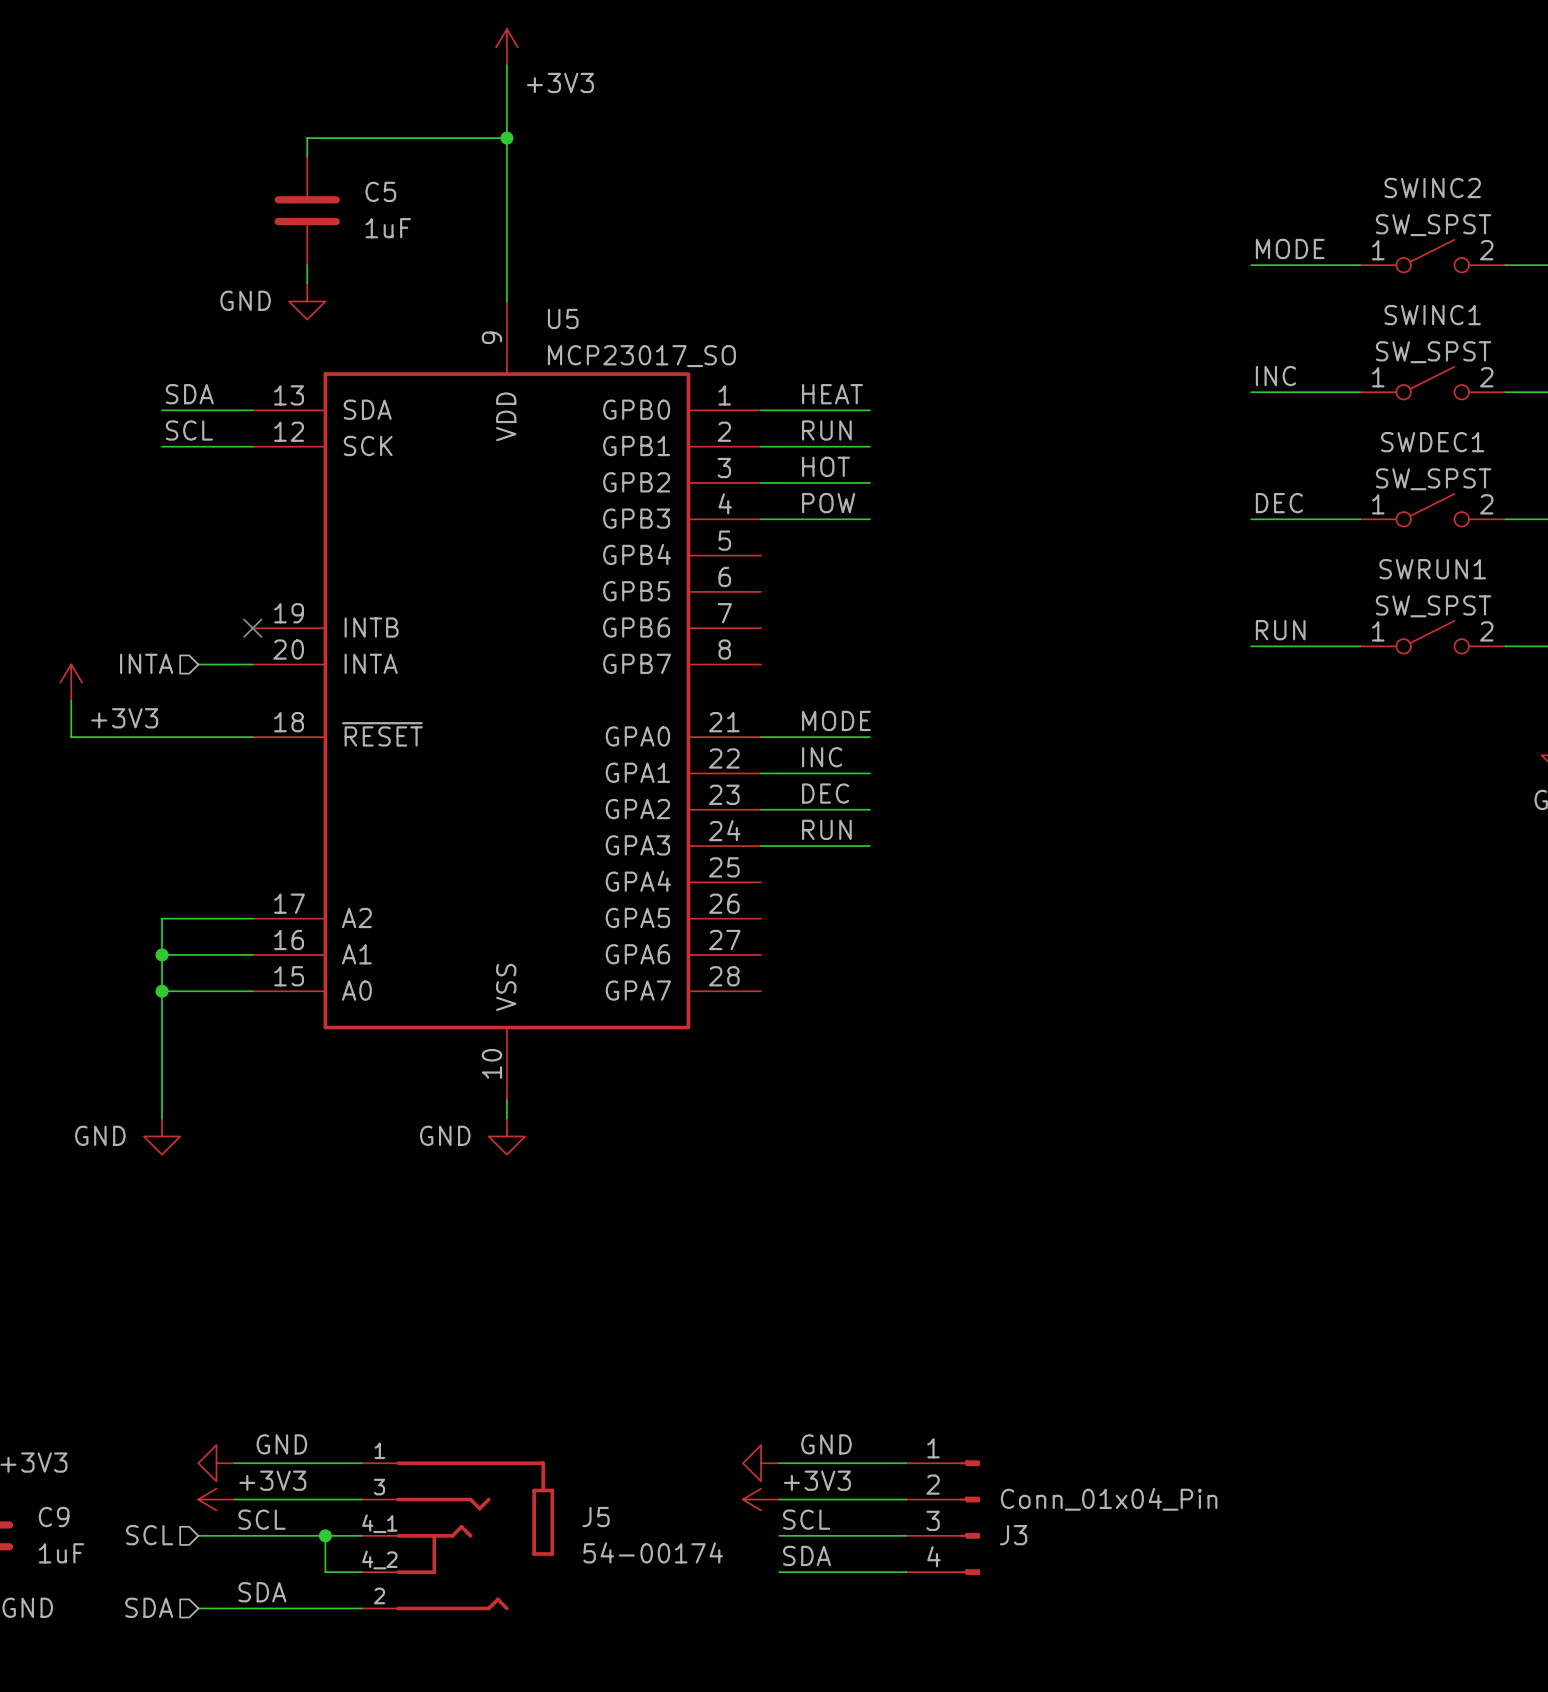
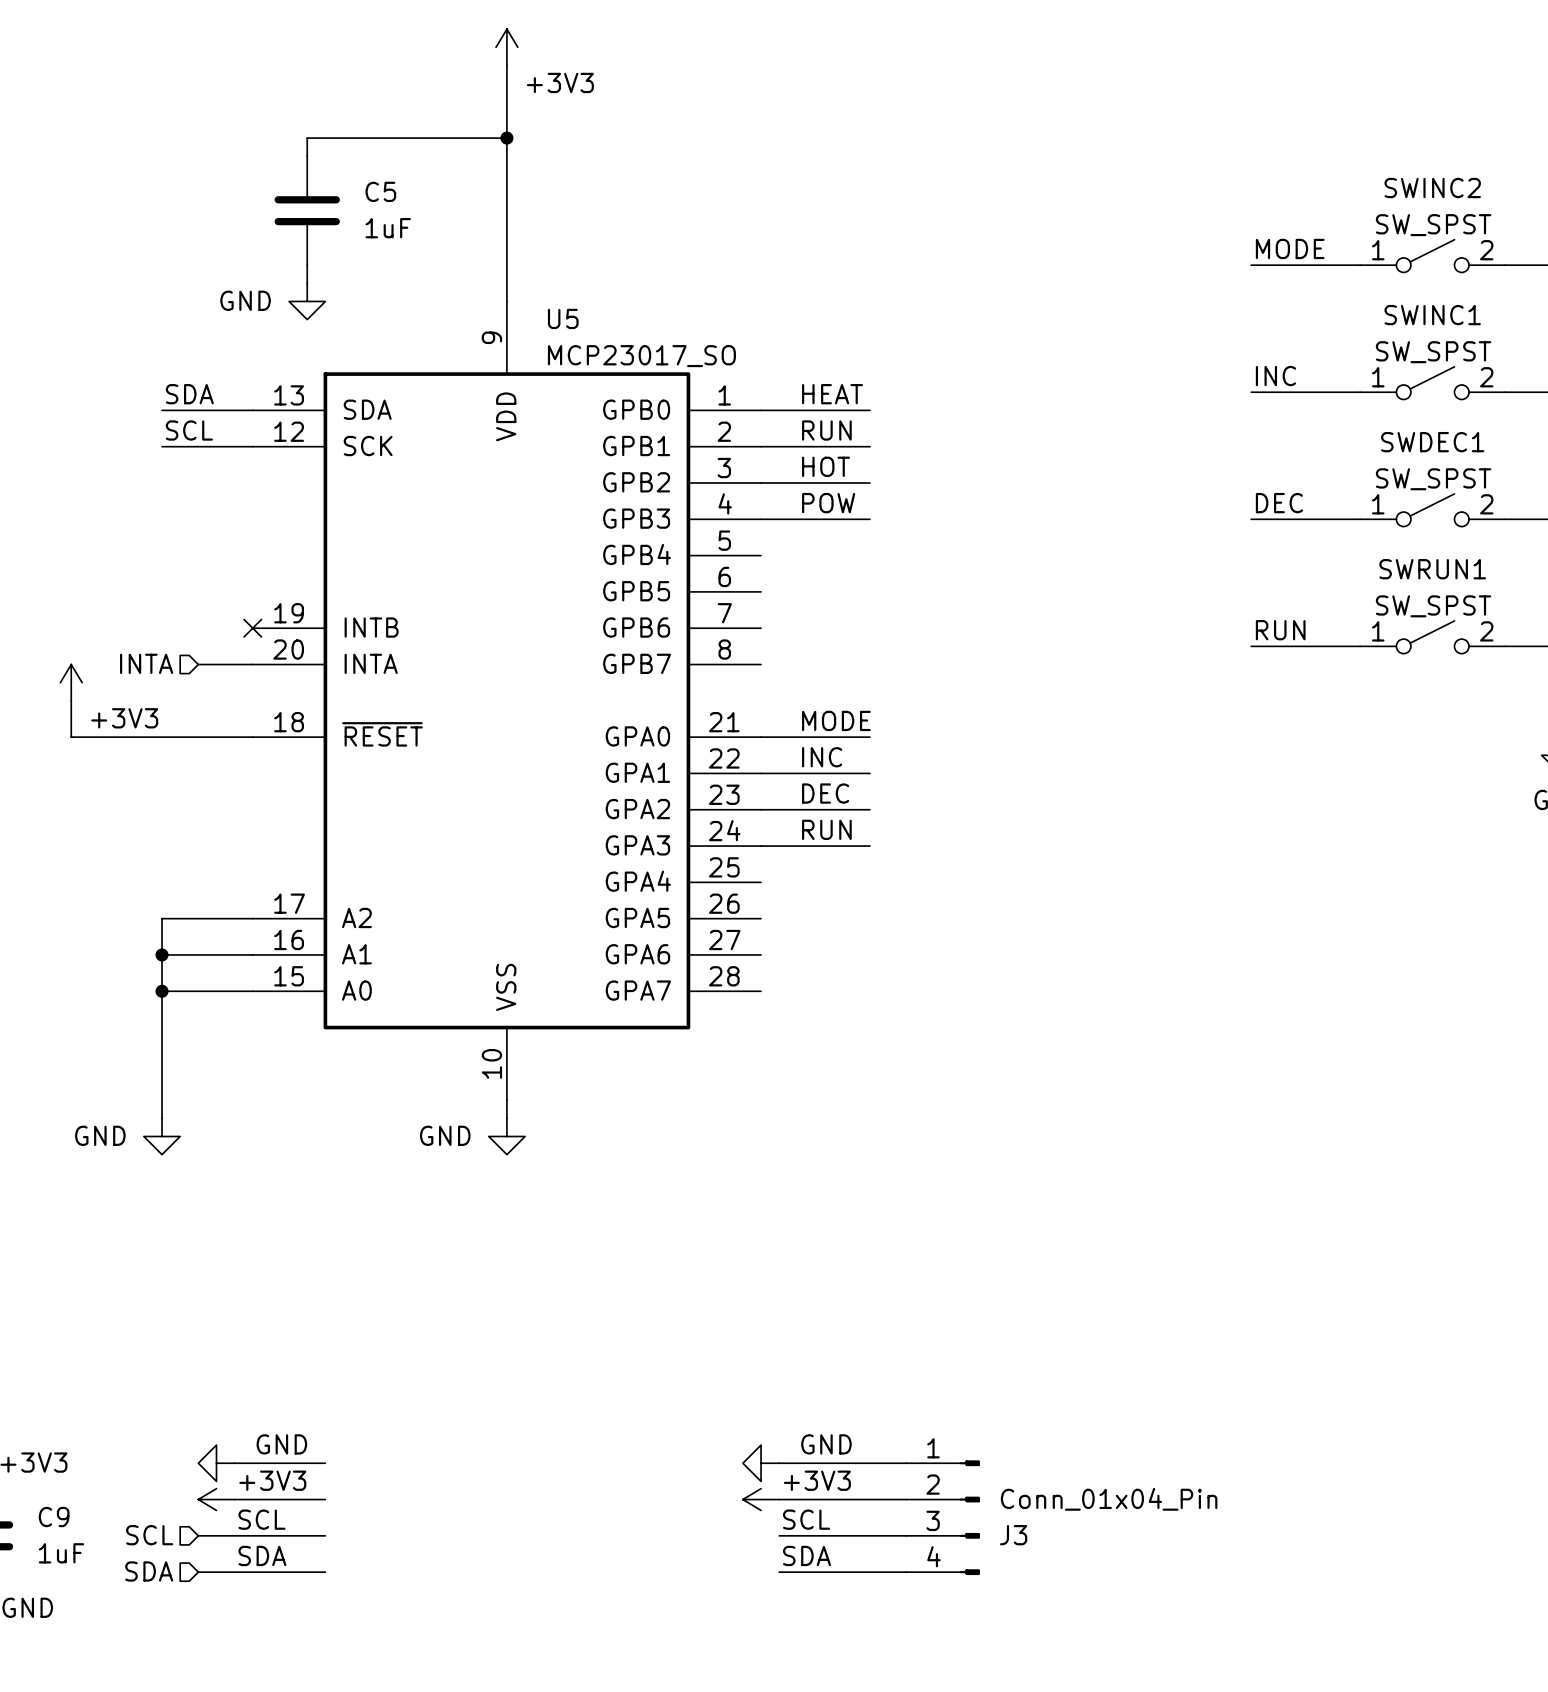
wire: (325, 1463) (361, 1463) -> none
wire: (325, 1499) (361, 1499) -> none
junction: (325, 1535) -> none
wire: (361, 1535) (325, 1535) (325, 1572) (361, 1572) -> none
J5: 54-00174 (457, 1535) -> none
wire: none -> (198, 1572) (325, 1572)
label position: SDA (262, 1592) -> SDA (262, 1555)
hierarchical label position: SDA (149, 1607) -> SDA (149, 1571)
wire: (198, 1608) (361, 1608) -> none

